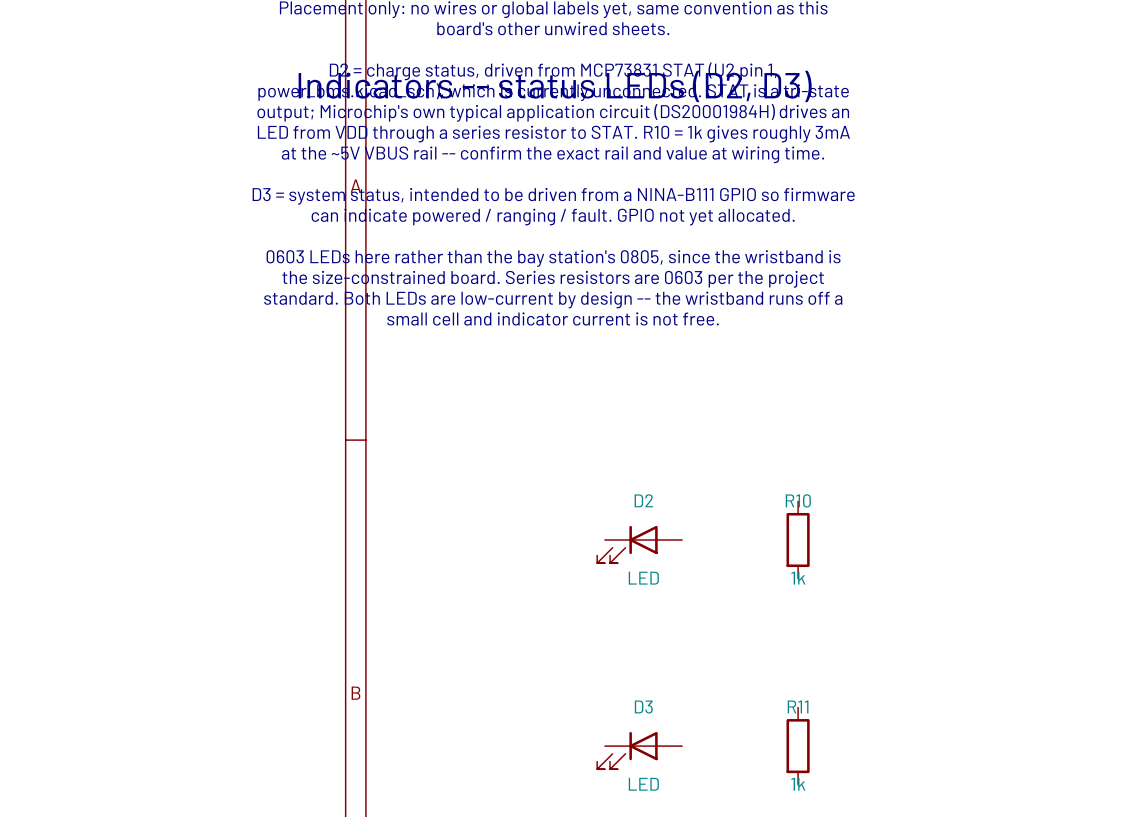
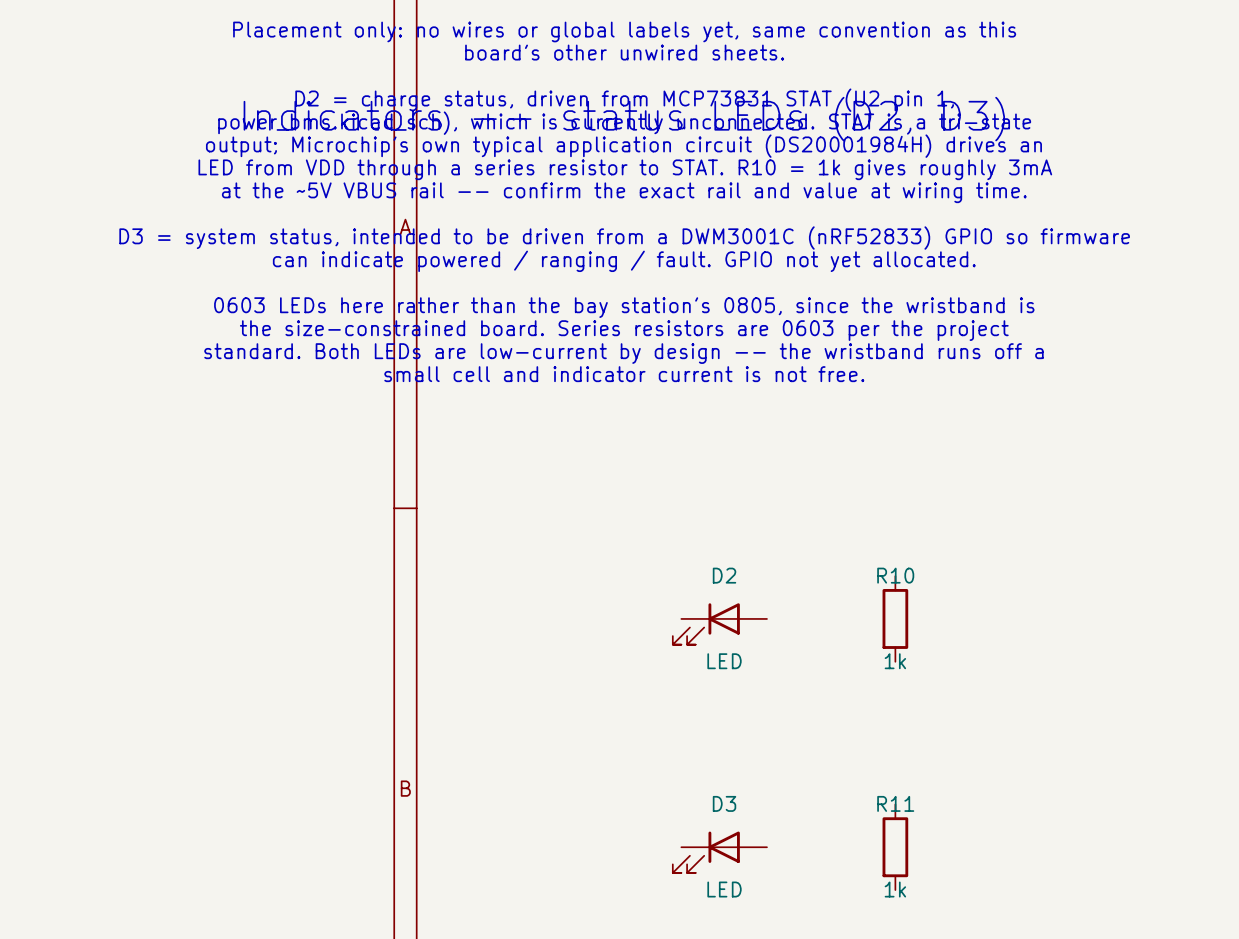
text: D3 = system status, intended to be driven from a NINA-B111 GPIO so firmware (553, 196) -> D3 = system status, intended to be driven from a DWM3001C (nRF52833) GPIO so firmware (624, 238)

